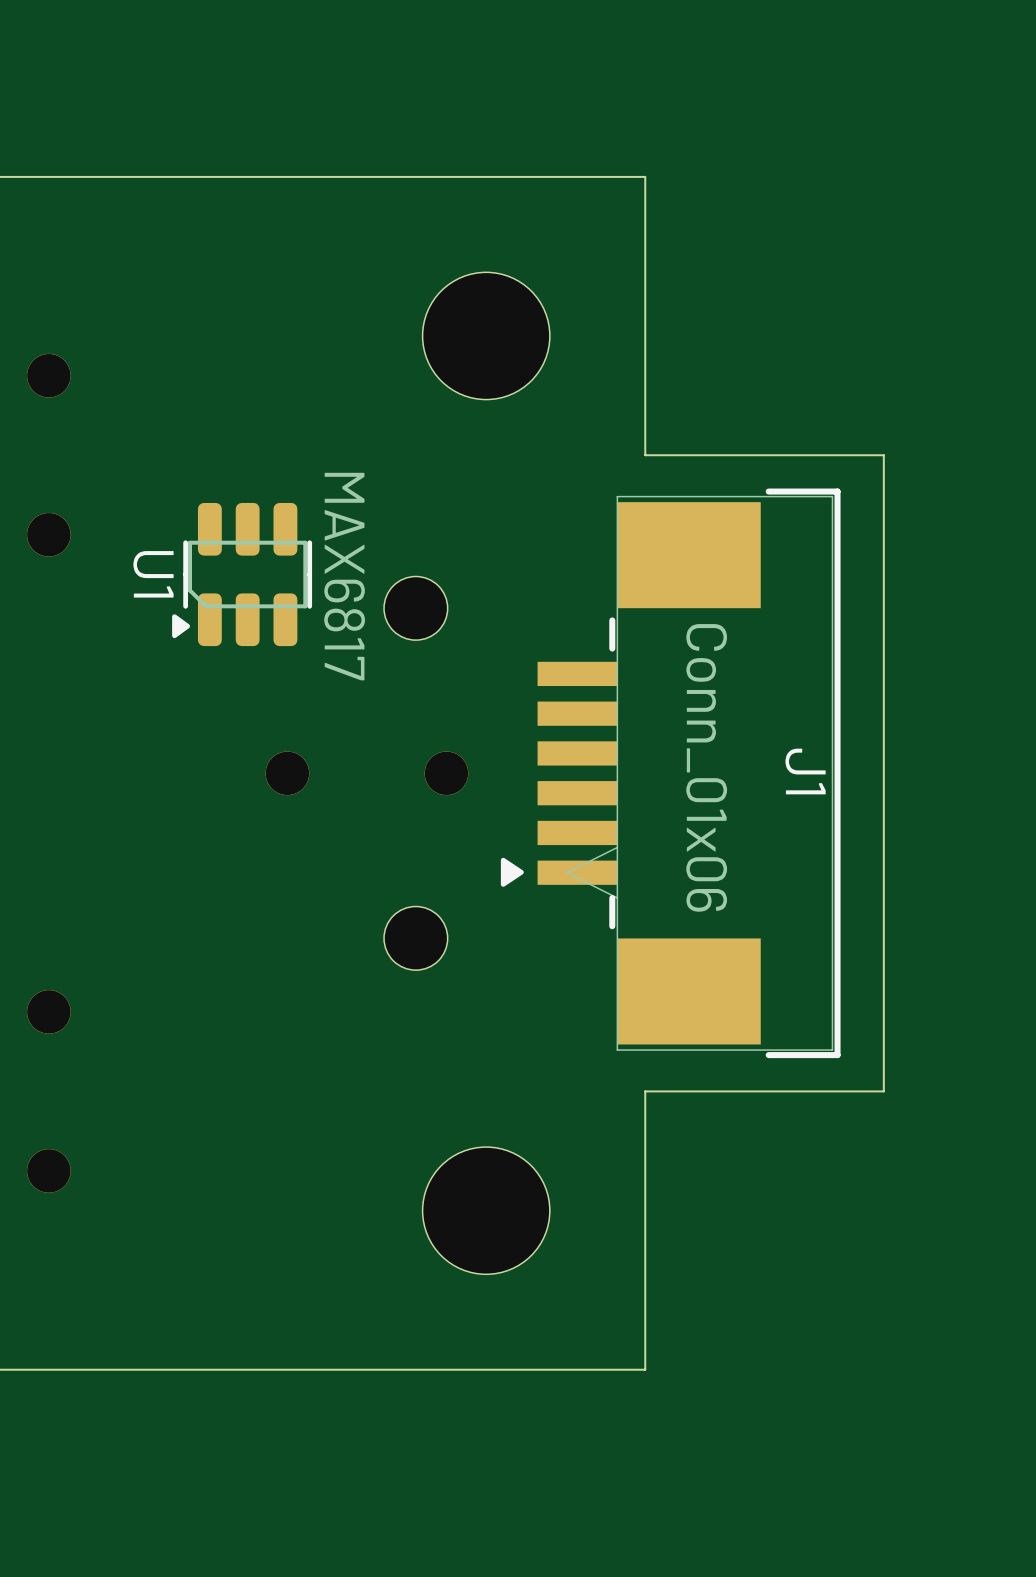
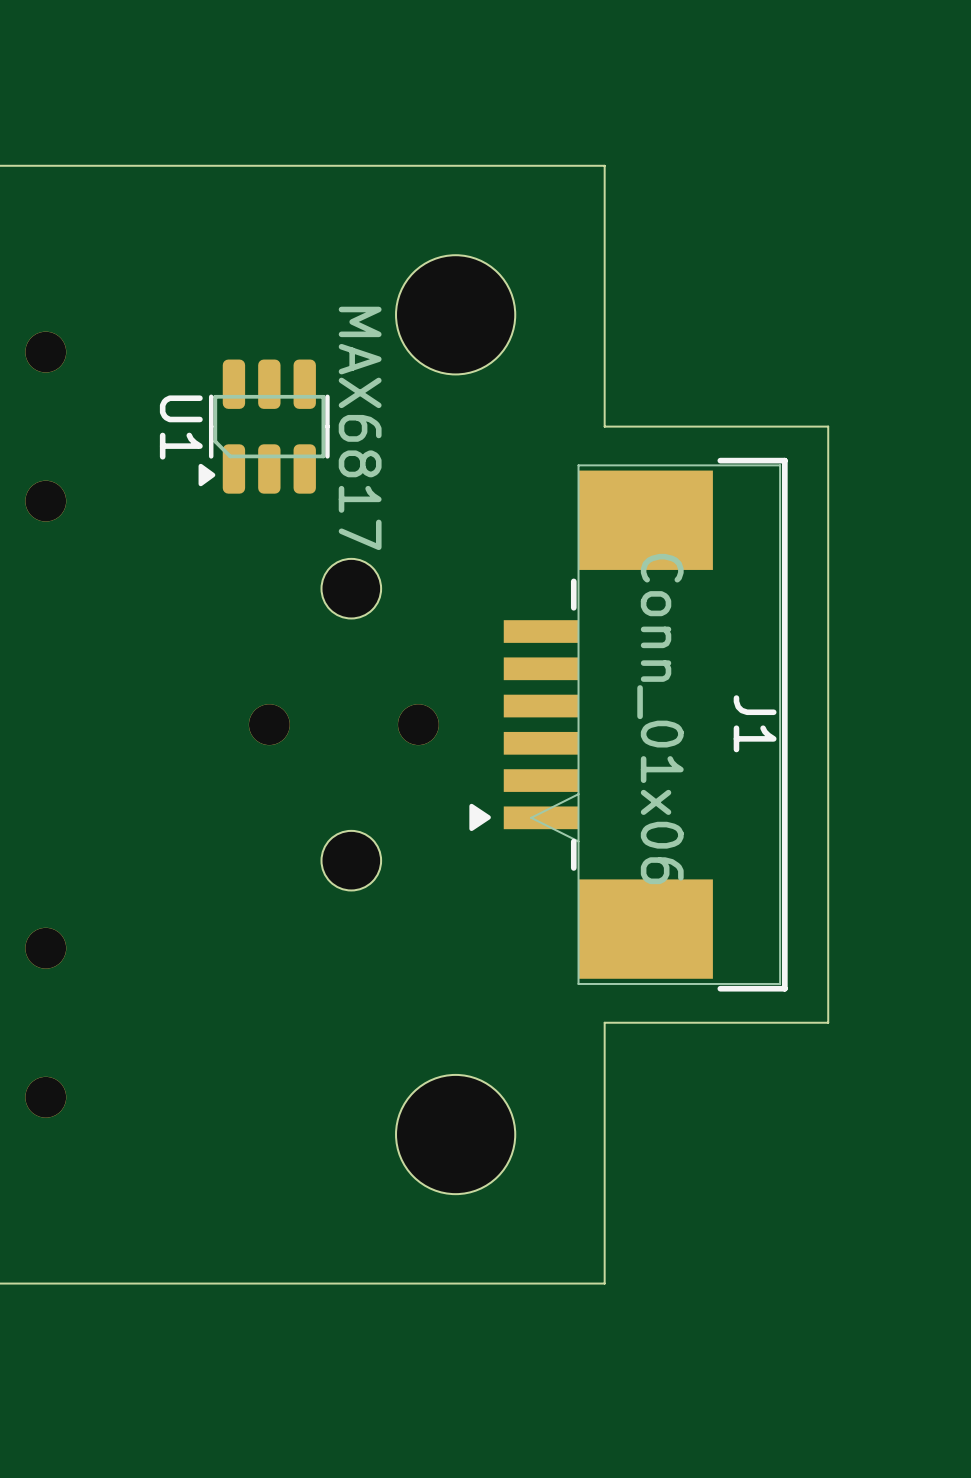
U1 position: (242, 574) -> (264, 426)
part position: (415, 608) -> (351, 588)
part position: (415, 938) -> (351, 860)

